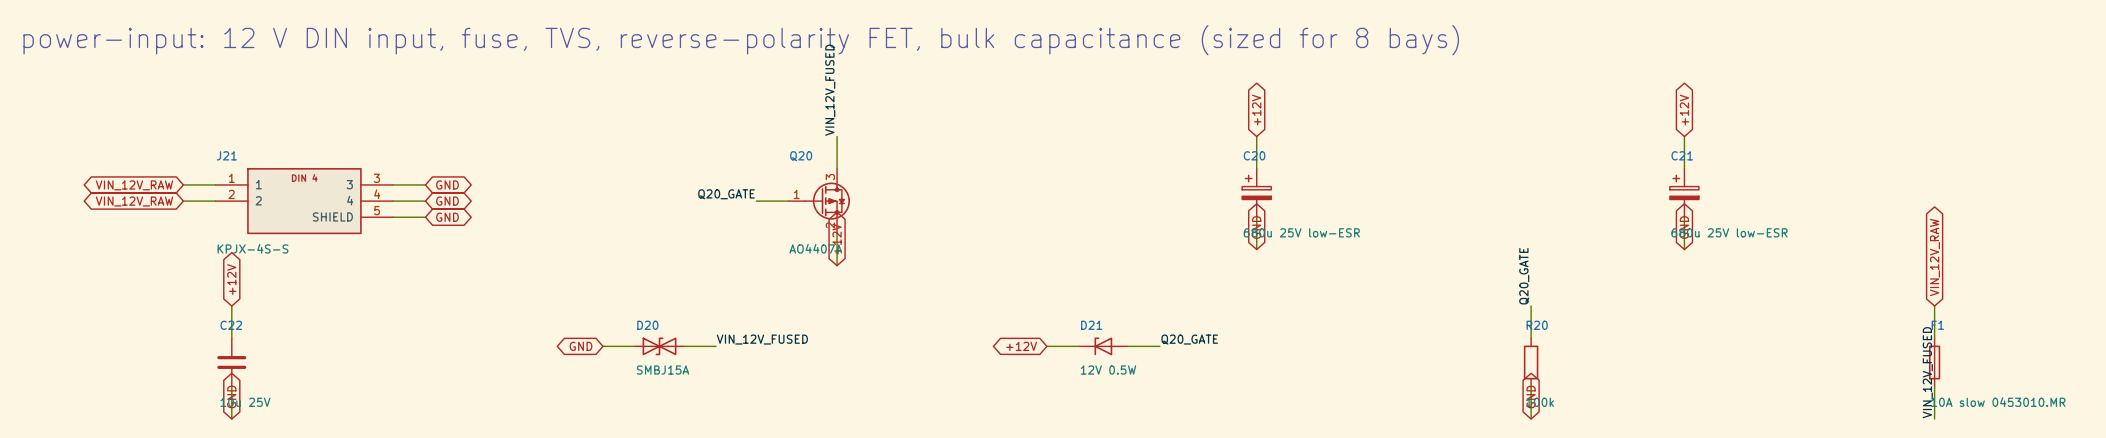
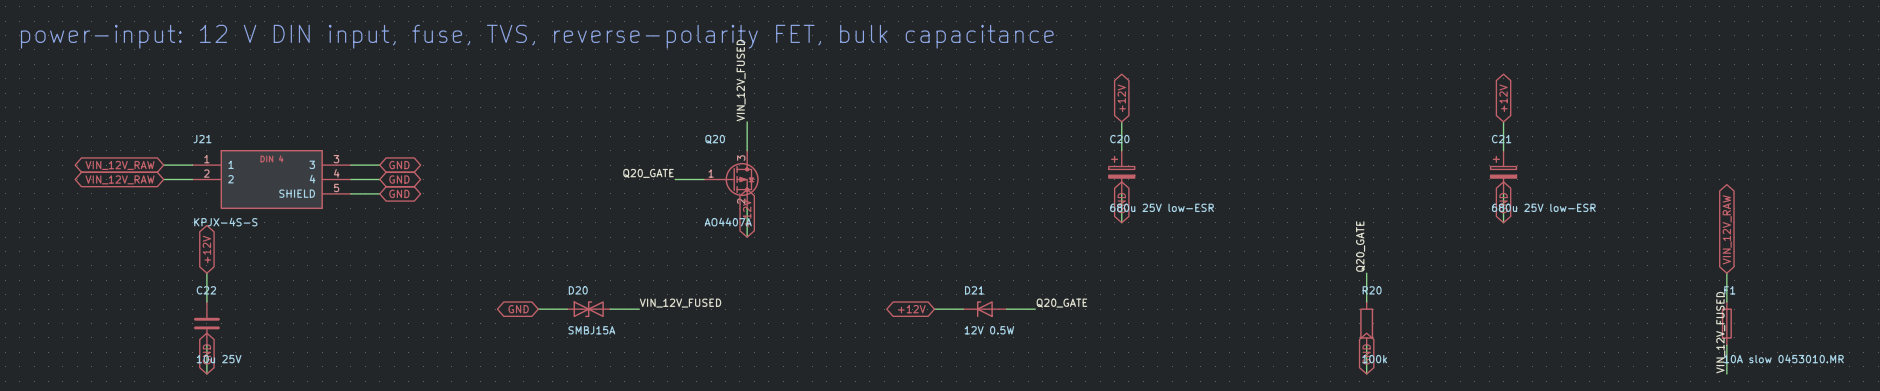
text: power-input: 12 V DIN input, fuse, TVS, reverse-polarity FET, bulk capacitance (sized for 8 bays) (741, 40) -> power-input: 12 V DIN input, fuse, TVS, reverse-polarity FET, bulk capacitance (537, 36)

